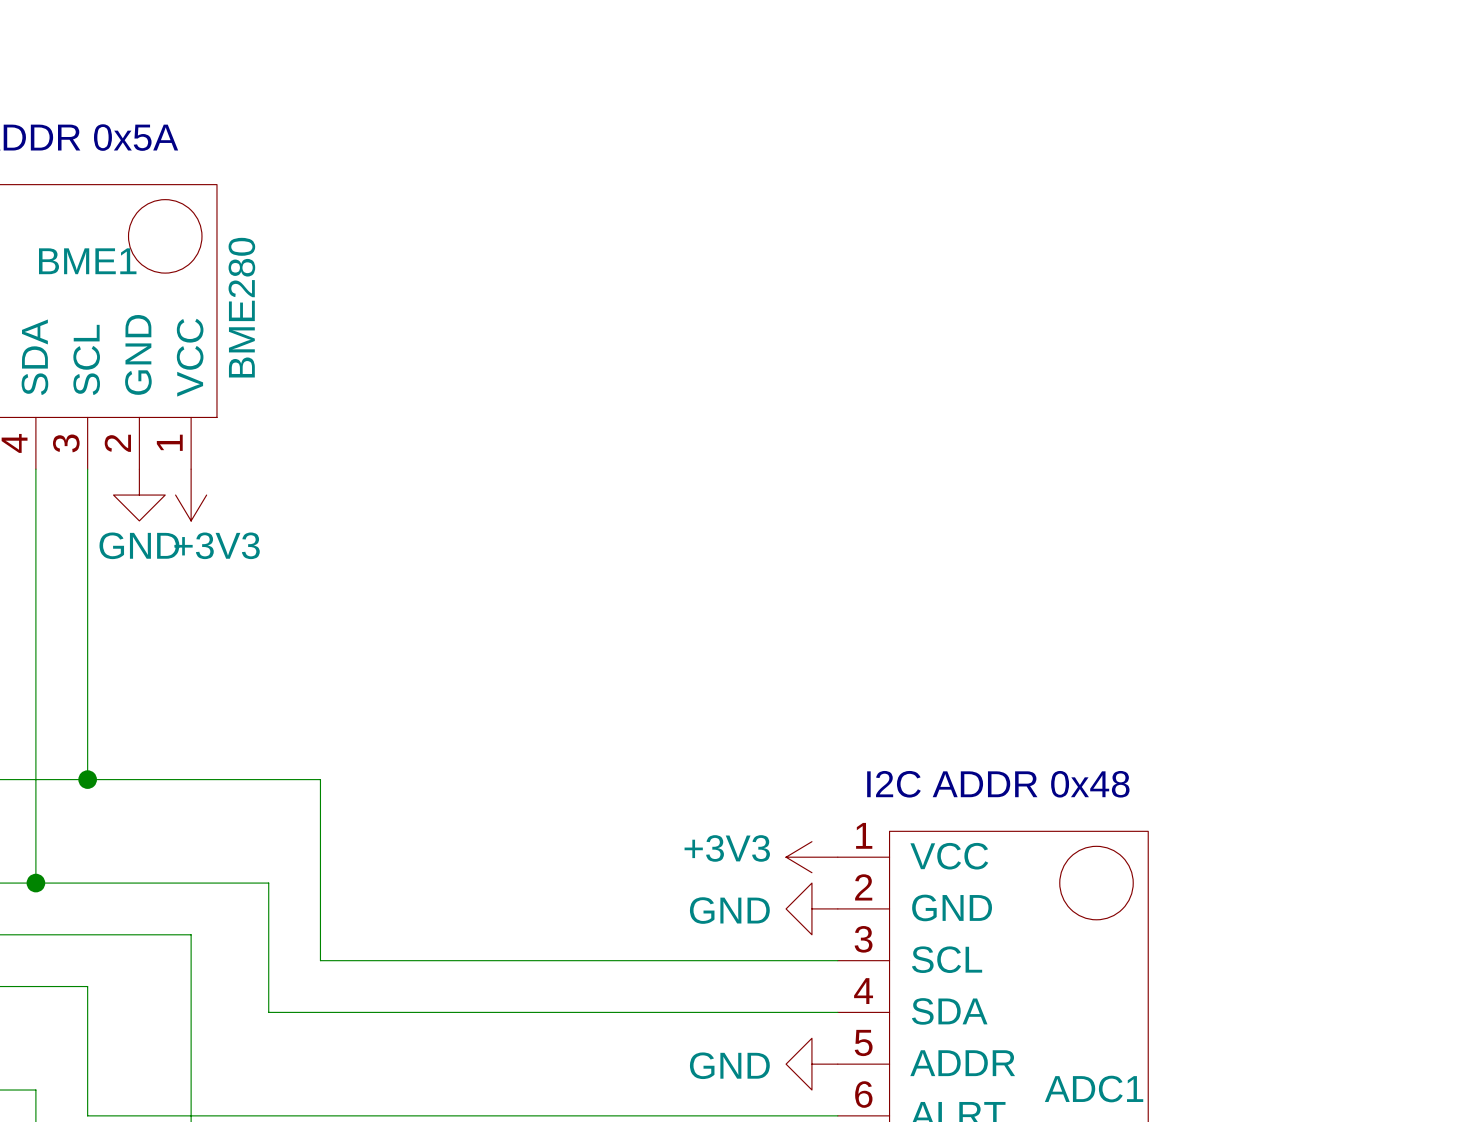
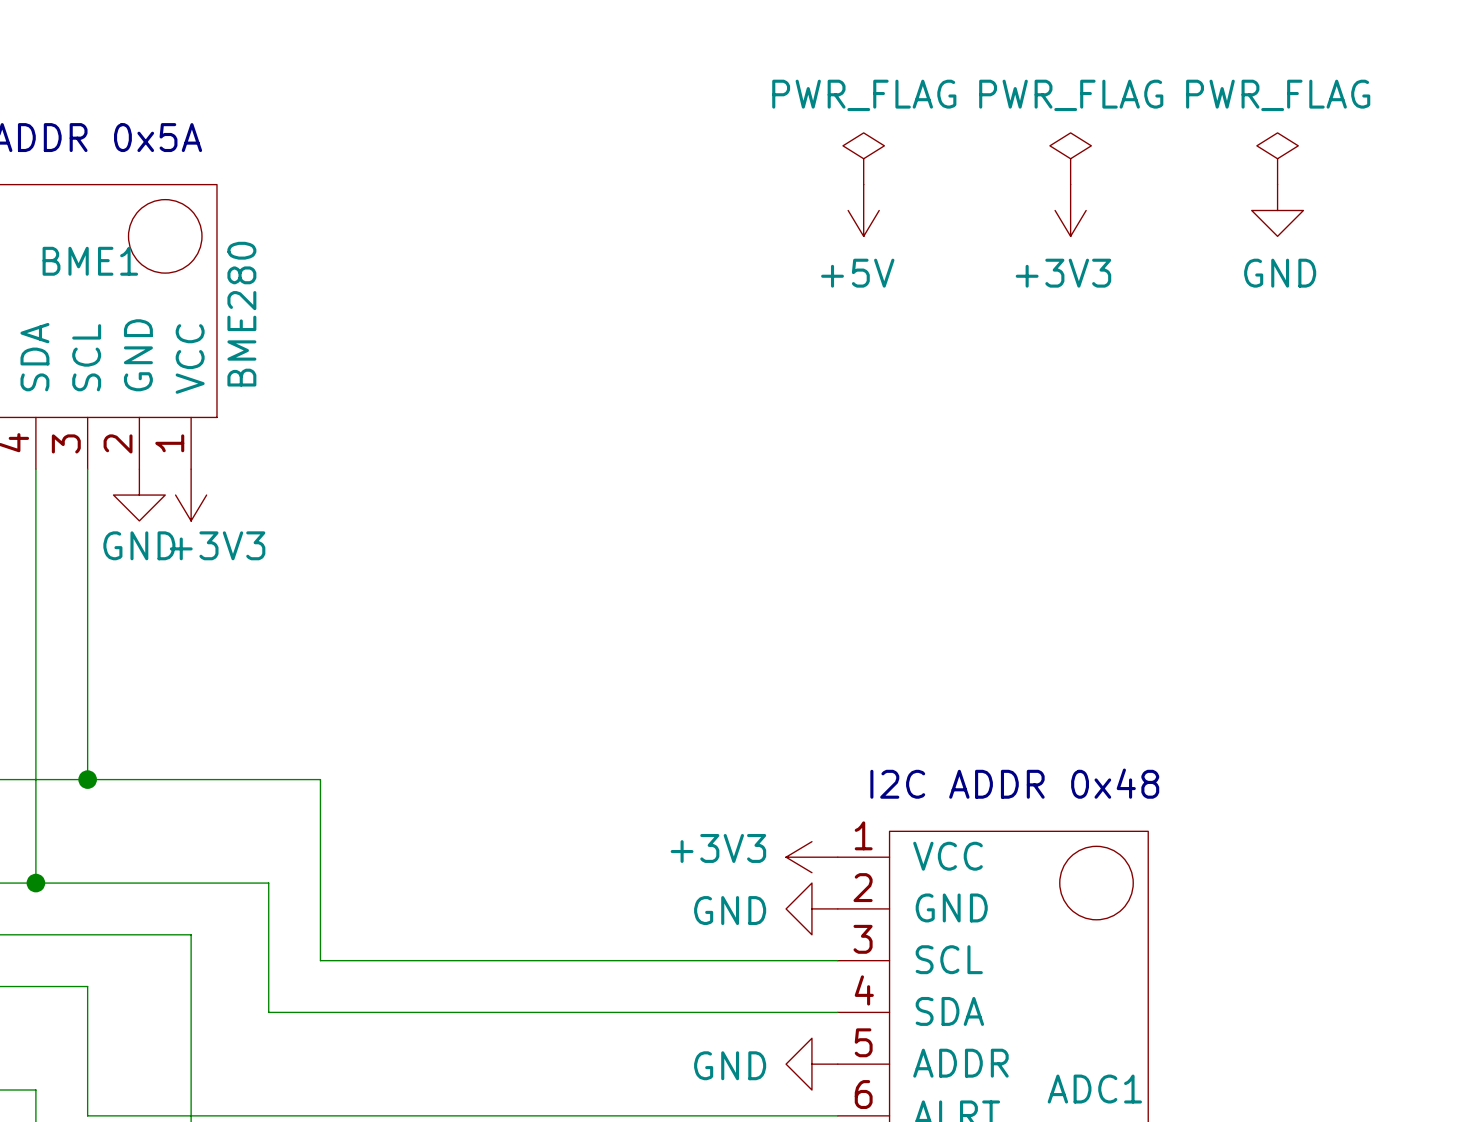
power symbol: none -> PWR_FLAG (863, 158)
power symbol: none -> PWR_FLAG (1070, 158)
power symbol: none -> PWR_FLAG (1277, 158)
power symbol: none -> +5V (863, 210)
power symbol: none -> +3V3 (1070, 210)
power symbol: none -> GND (1277, 210)

